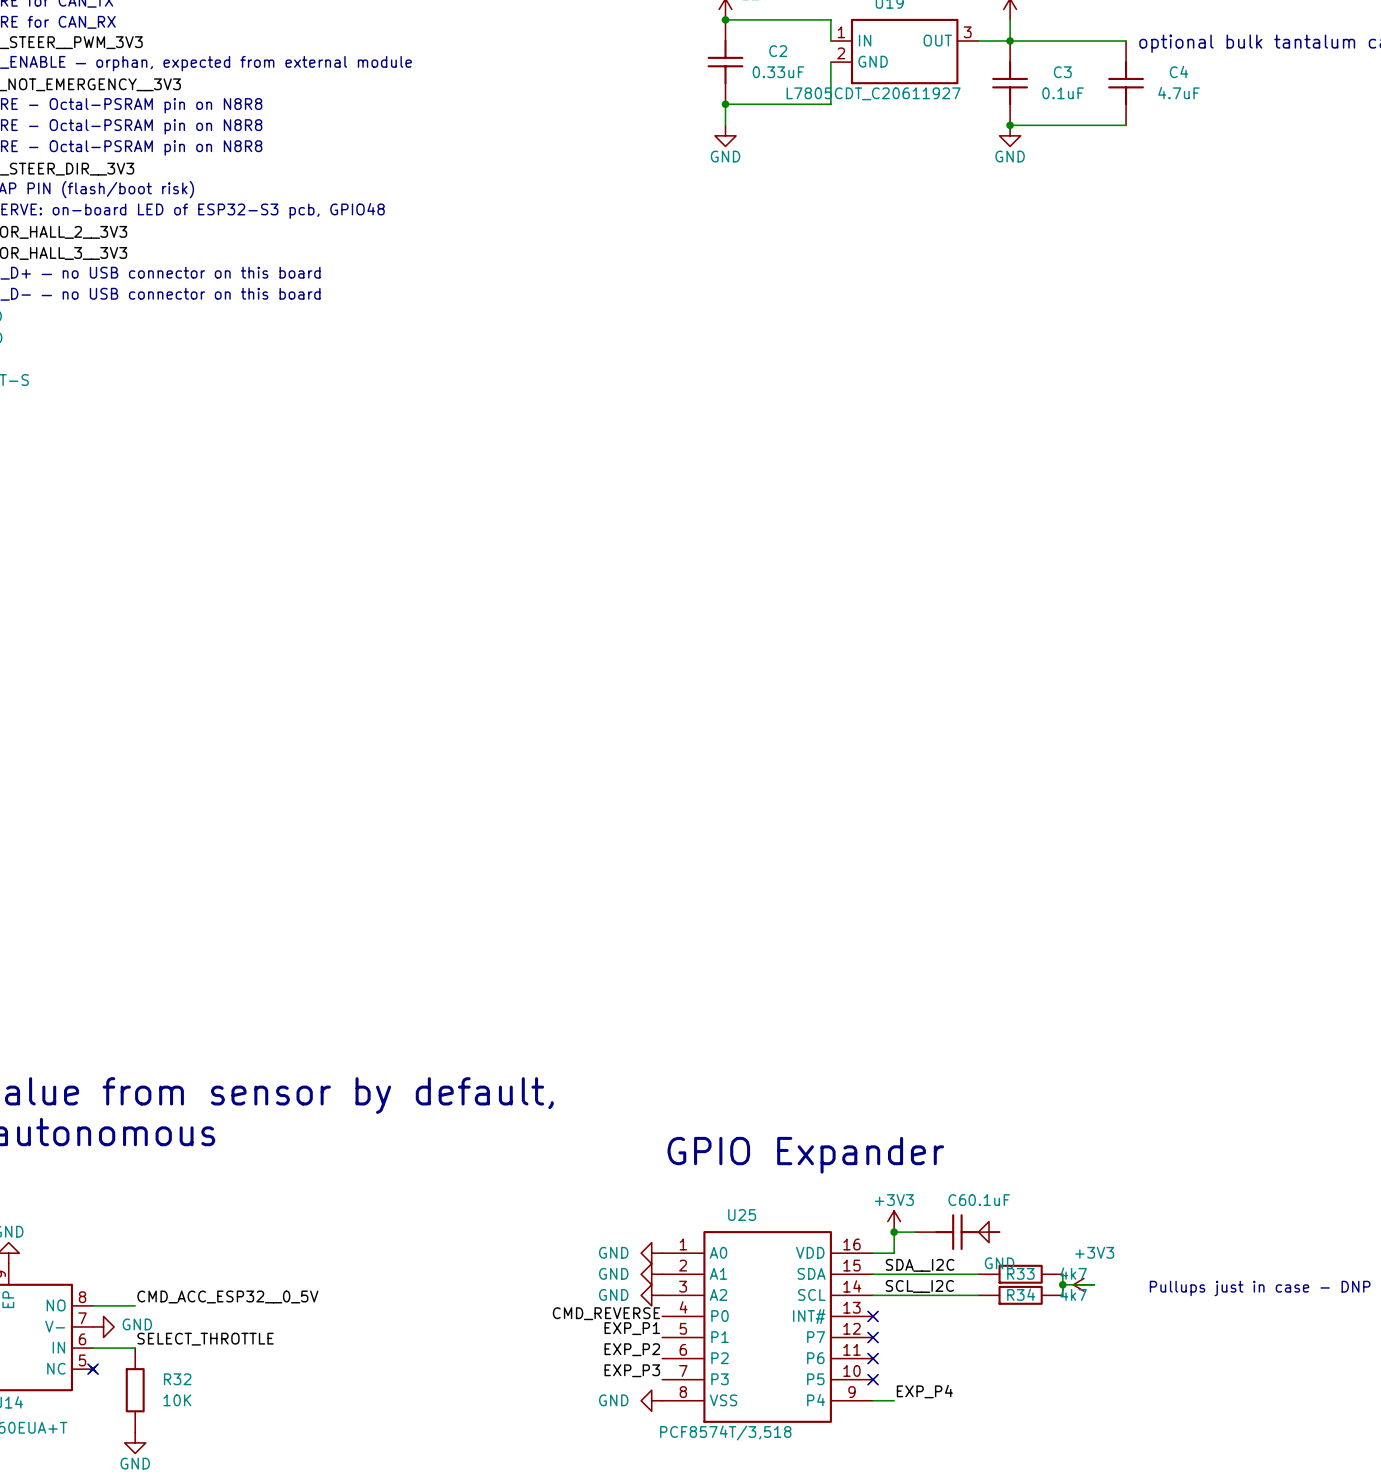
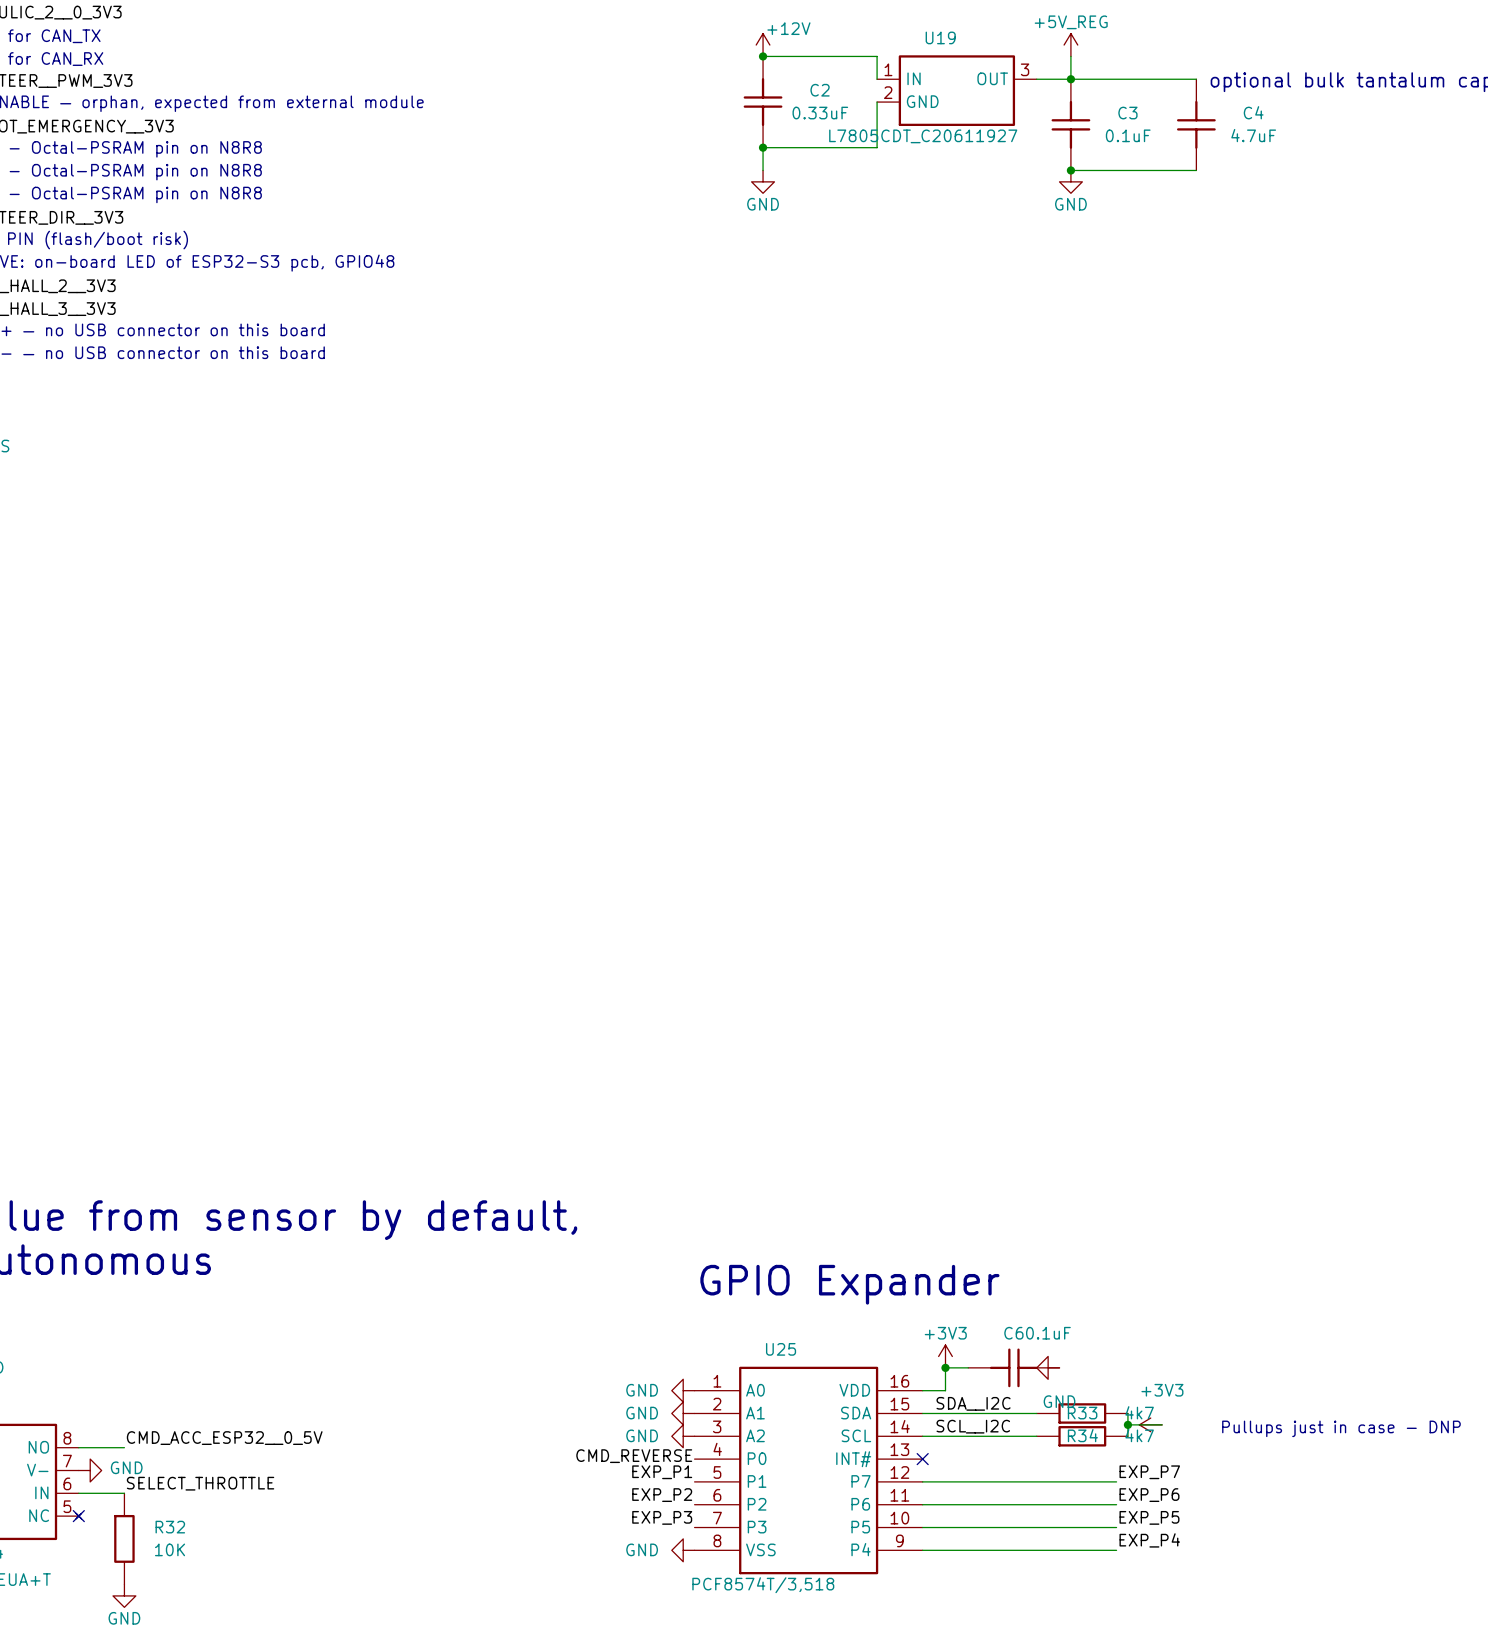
label: none -> EXP_P7 (1149, 1472)
wire: none -> (922, 1481) (1116, 1481)
no-connect mark: (873, 1337) -> none
label: none -> EXP_P6 (1149, 1495)
wire: none -> (922, 1504) (1116, 1504)
no-connect mark: (873, 1358) -> none
label: none -> EXP_P5 (1149, 1517)
wire: none -> (922, 1527) (1116, 1527)
no-connect mark: (873, 1379) -> none
label position: EXP_P4 (924, 1391) -> EXP_P4 (1149, 1540)
wire: none -> (945, 1550) (1116, 1550)

